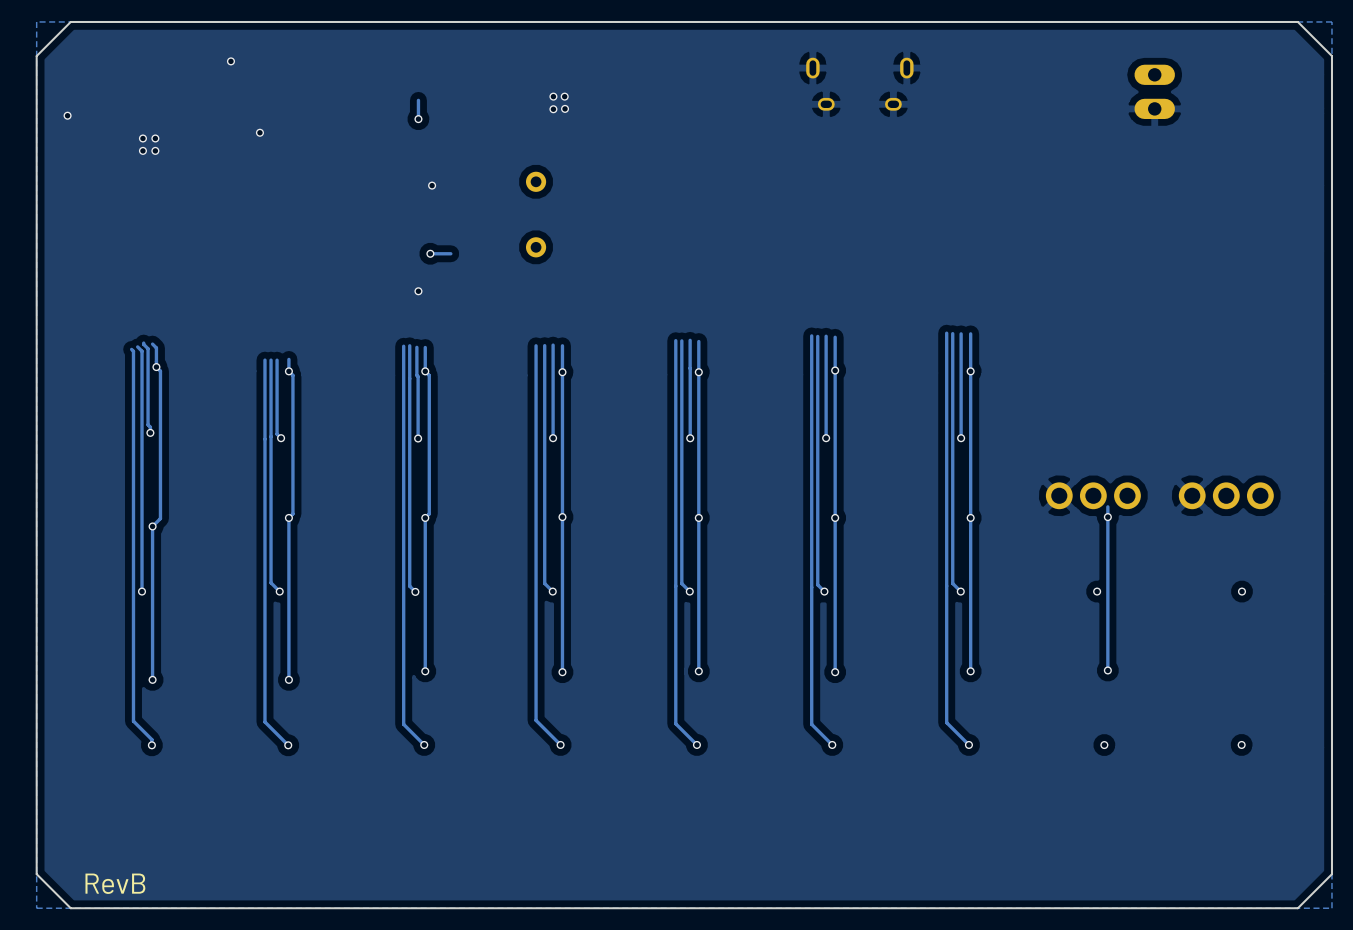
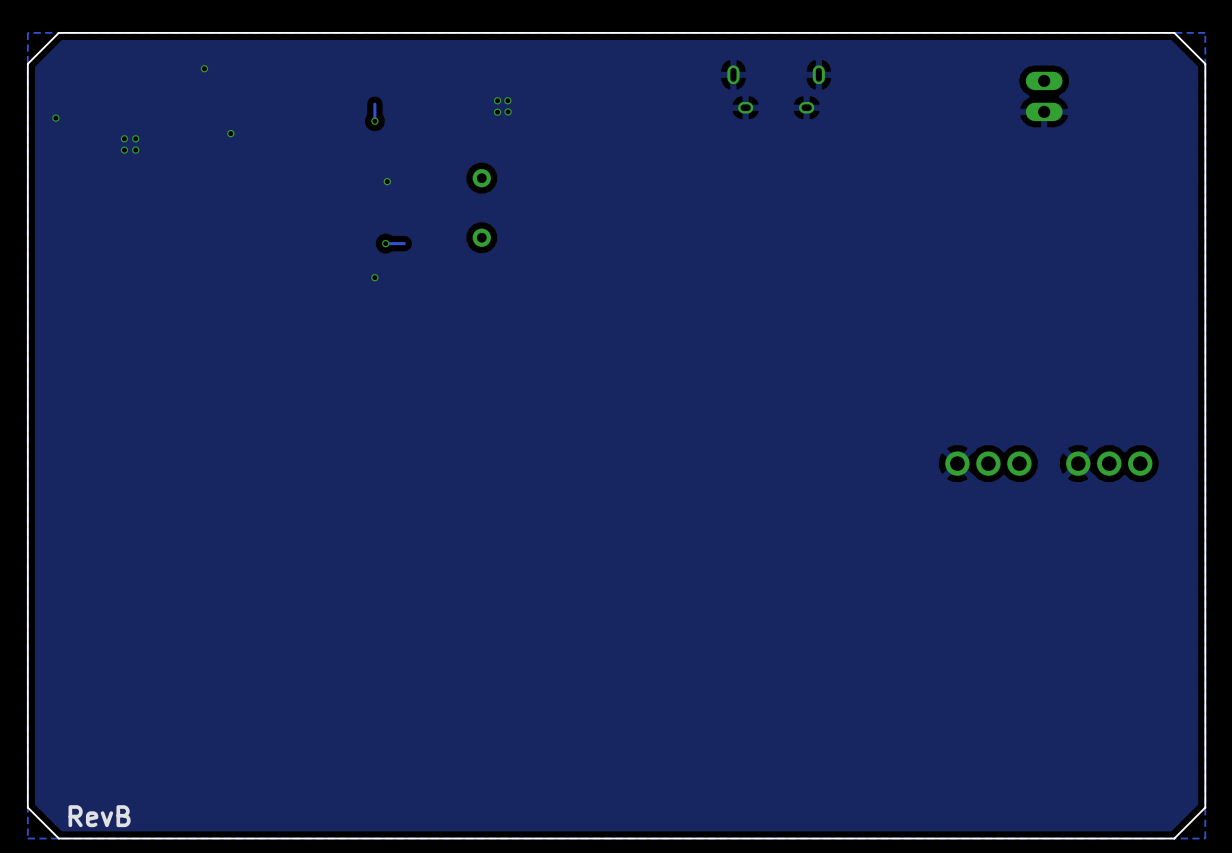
track: (946, 333) (946, 722) (968, 744) -> none
track: (952, 333) (952, 583) (960, 591) -> none
track: (961, 333) (961, 438) -> none
track: (970, 333) (970, 671) -> none
track: (811, 335) (811, 724) (832, 744) -> none
track: (817, 336) (817, 584) (824, 591) -> none
track: (826, 336) (826, 438) -> none
track: (835, 337) (835, 672) -> none
track: (675, 340) (675, 723) (696, 744) -> none
track: (681, 340) (681, 583) (689, 591) -> none
track: (690, 340) (690, 368) -> none
track: (698, 341) (698, 671) -> none
track: (143, 343) (148, 348) (148, 424) (150, 427) (150, 432) -> none
track: (152, 344) (156, 347) (156, 367) (160, 371) (160, 518) (152, 526) (152, 679) -> none
track: (409, 345) (409, 586) (415, 591) -> none
track: (536, 345) (536, 720) (560, 744) -> none
track: (544, 345) (544, 583) (552, 591) -> none
track: (553, 345) (553, 438) -> none
track: (562, 345) (562, 672) -> none
track: (137, 346) (142, 351) (142, 591) -> none
track: (403, 346) (403, 724) (424, 744) -> none
track: (416, 347) (418, 438) -> none
track: (425, 347) (425, 371) (429, 375) (429, 513) (425, 517) (425, 671) -> none
track: (131, 349) (133, 351) (133, 721) (151, 739) (151, 745) -> none
track: (288, 359) (288, 371) (292, 375) (292, 513) (288, 517) (288, 679) -> none
track: (264, 360) (264, 722) (288, 745) -> none
track: (271, 360) (271, 582) (279, 591) -> none
track: (277, 360) (277, 434) (281, 438) -> none
via: (156, 367) -> none
track: (690, 368) (690, 438) -> none
via: (835, 370) -> none
via: (288, 371) -> none
via: (425, 371) -> none
via: (970, 371) -> none
via: (562, 372) -> none
via: (698, 372) -> none
via: (150, 432) -> none
via: (281, 438) -> none
via: (418, 438) -> none
via: (553, 438) -> none
via: (690, 438) -> none
via: (826, 438) -> none
via: (961, 438) -> none
track: (1107, 506) (1107, 670) -> none
via: (288, 517) -> none
via: (425, 517) -> none
via: (562, 517) -> none
via: (698, 517) -> none
via: (835, 517) -> none
via: (970, 517) -> none
via: (1107, 517) -> none
via: (152, 526) -> none
via: (142, 591) -> none
via: (279, 591) -> none
via: (415, 591) -> none
via: (552, 591) -> none
via: (689, 591) -> none
via: (824, 591) -> none
via: (960, 591) -> none
via: (1097, 591) -> none
via: (1241, 591) -> none
via: (1107, 670) -> none
via: (425, 671) -> none
via: (698, 671) -> none
via: (970, 671) -> none
via: (562, 672) -> none
via: (835, 672) -> none
via: (152, 679) -> none
via: (288, 679) -> none
via: (424, 744) -> none
via: (560, 744) -> none
via: (696, 744) -> none
via: (832, 744) -> none
via: (968, 744) -> none
via: (1241, 744) -> none
via: (151, 745) -> none
via: (288, 745) -> none
via: (1104, 745) -> none

